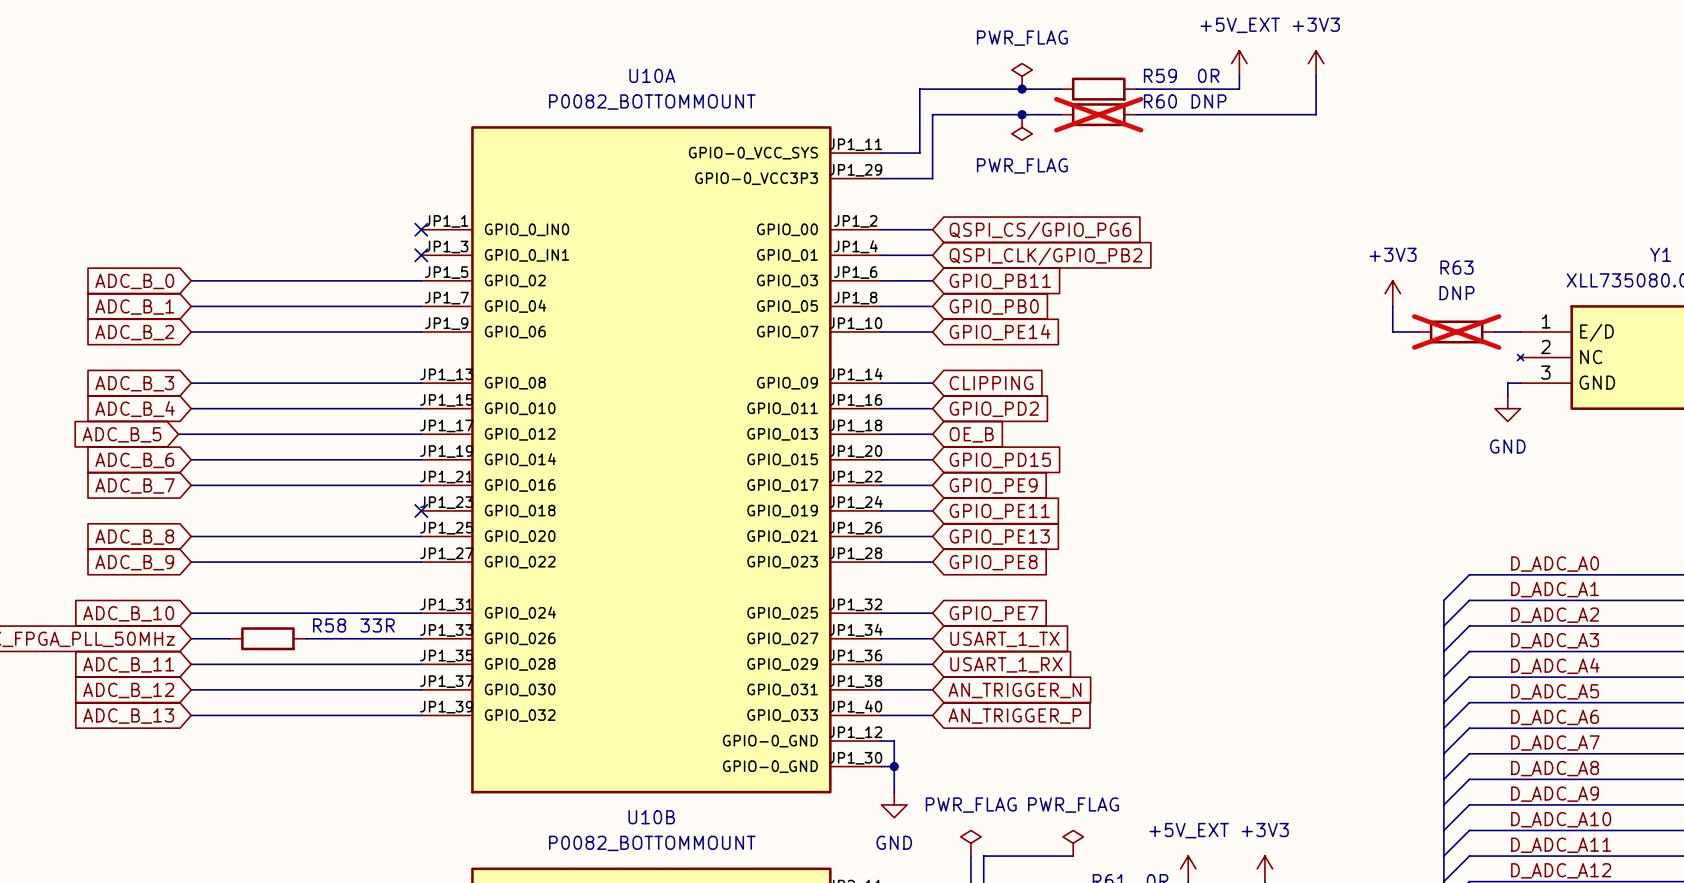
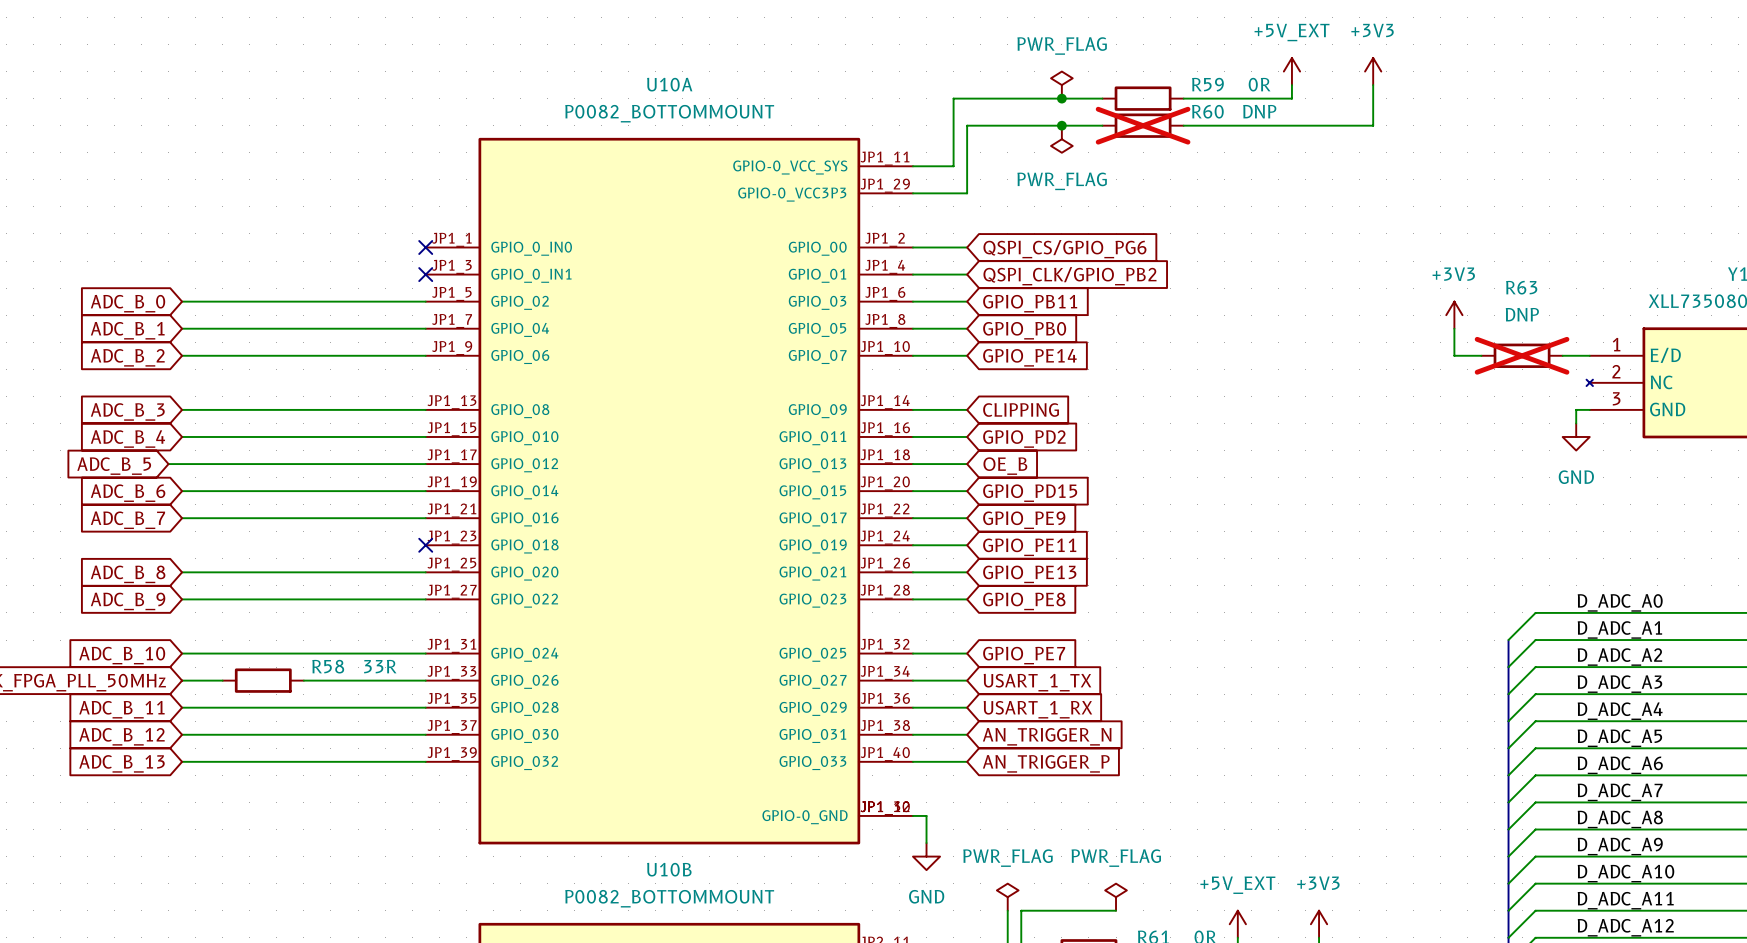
U10A symbol: [421, 126, 882, 794] -> [425, 137, 913, 845]
wire: (881, 741) (894, 741) (894, 766) -> none
junction: (894, 766) -> none

